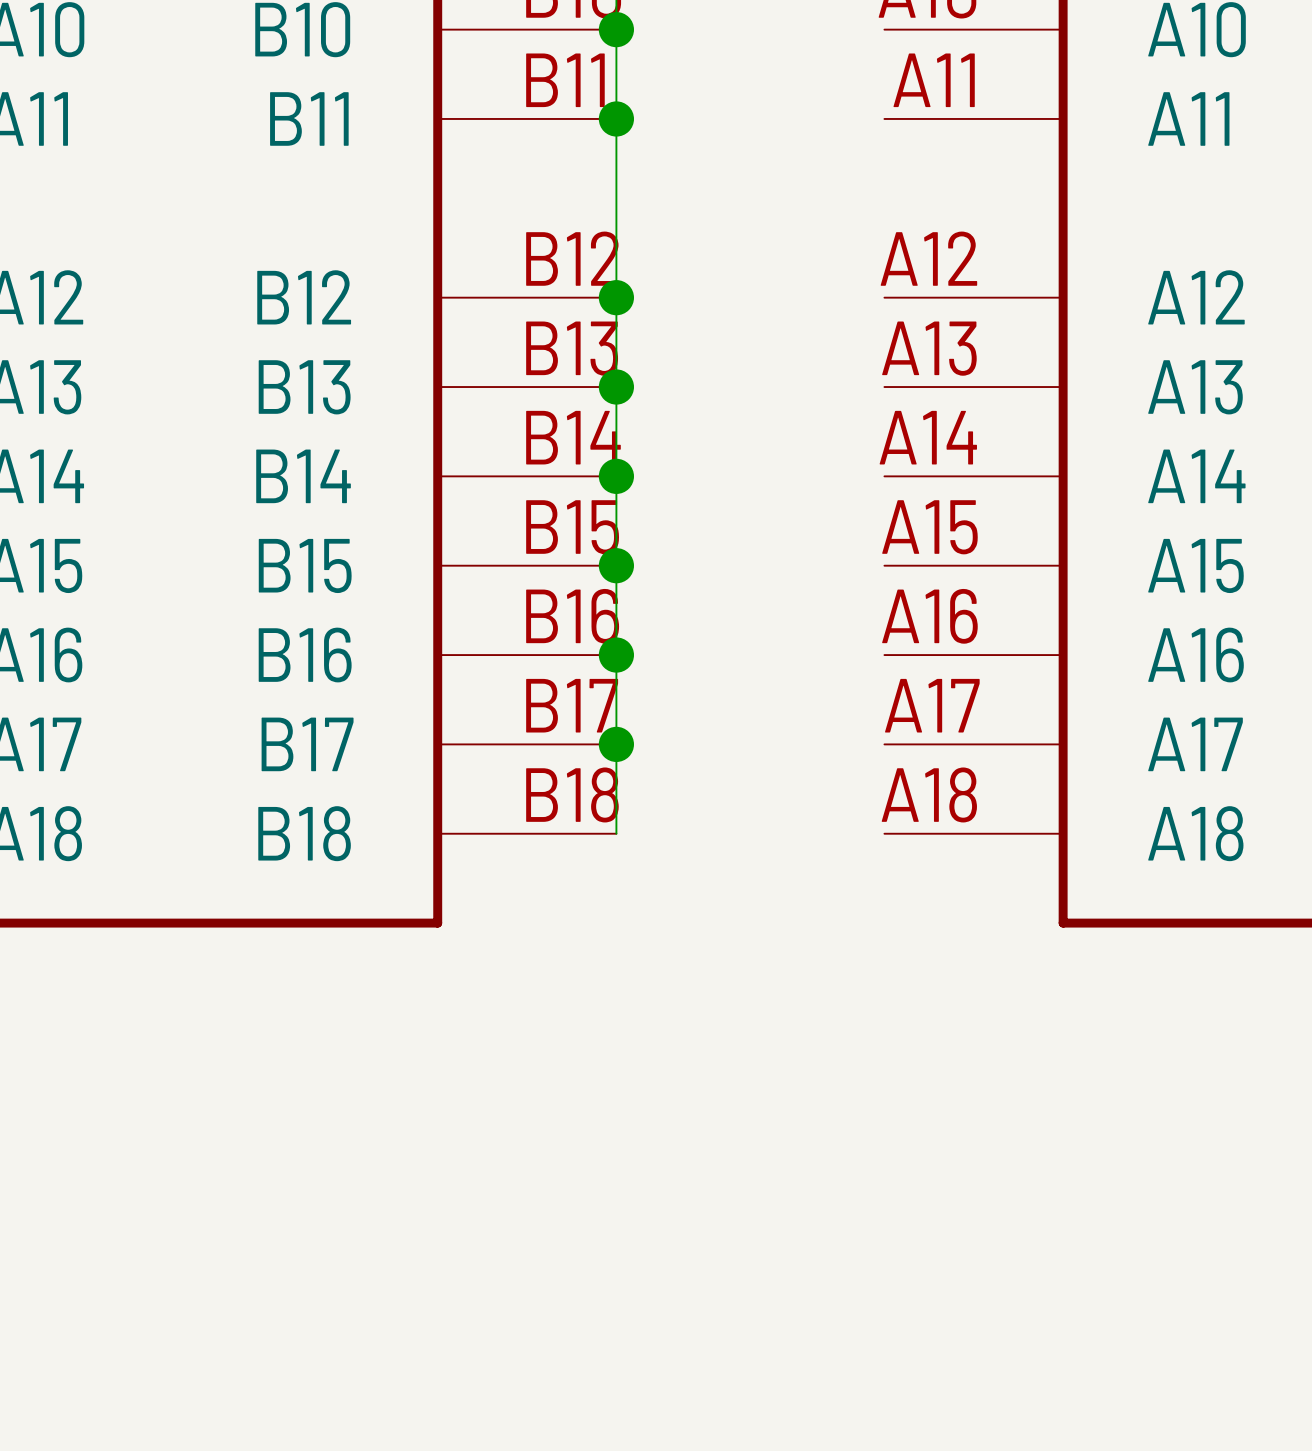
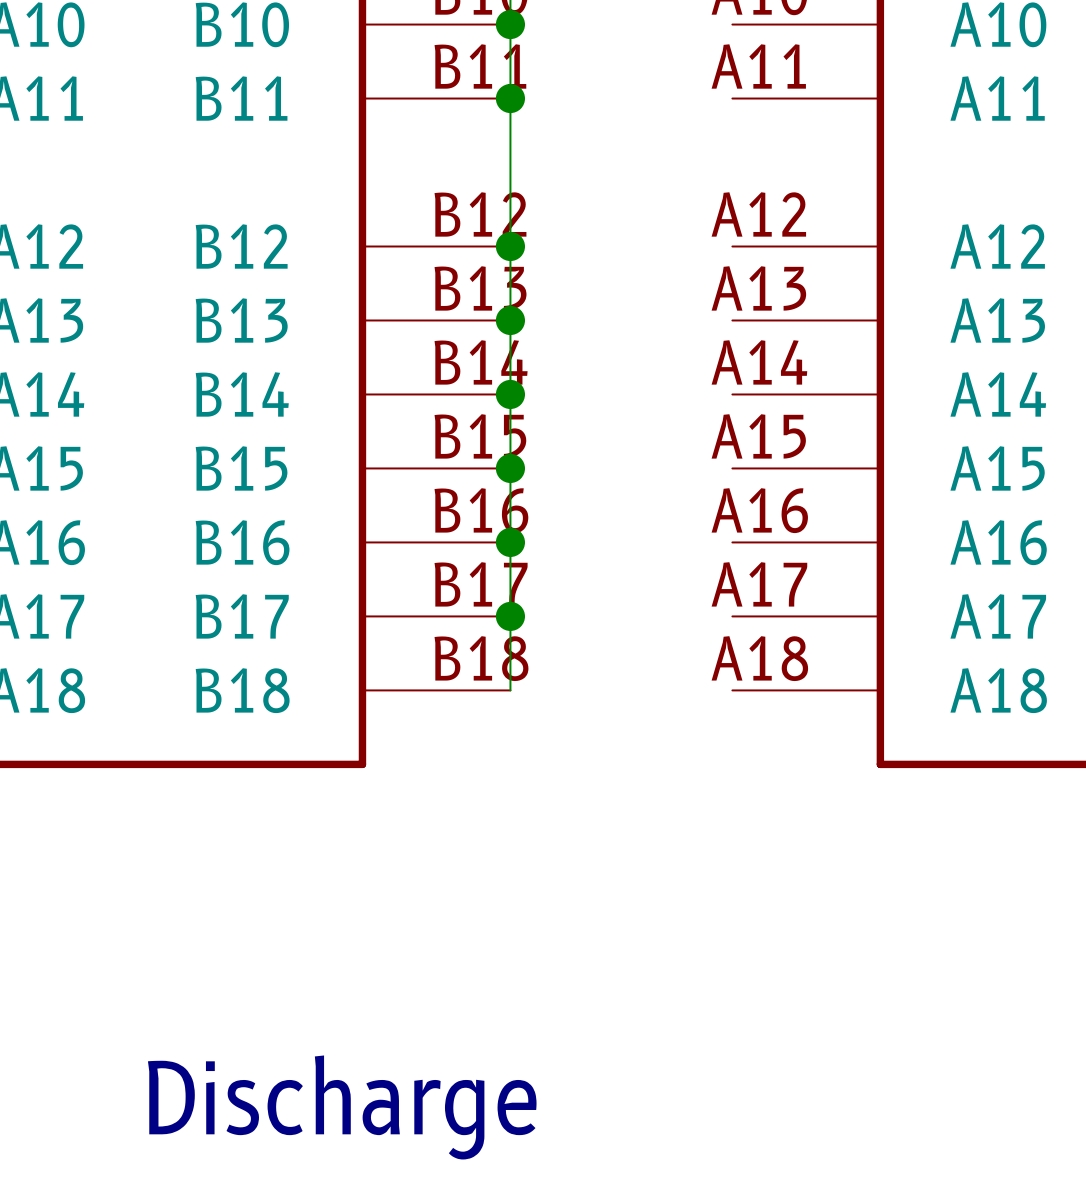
text: none -> Discharge (342, 1107)

